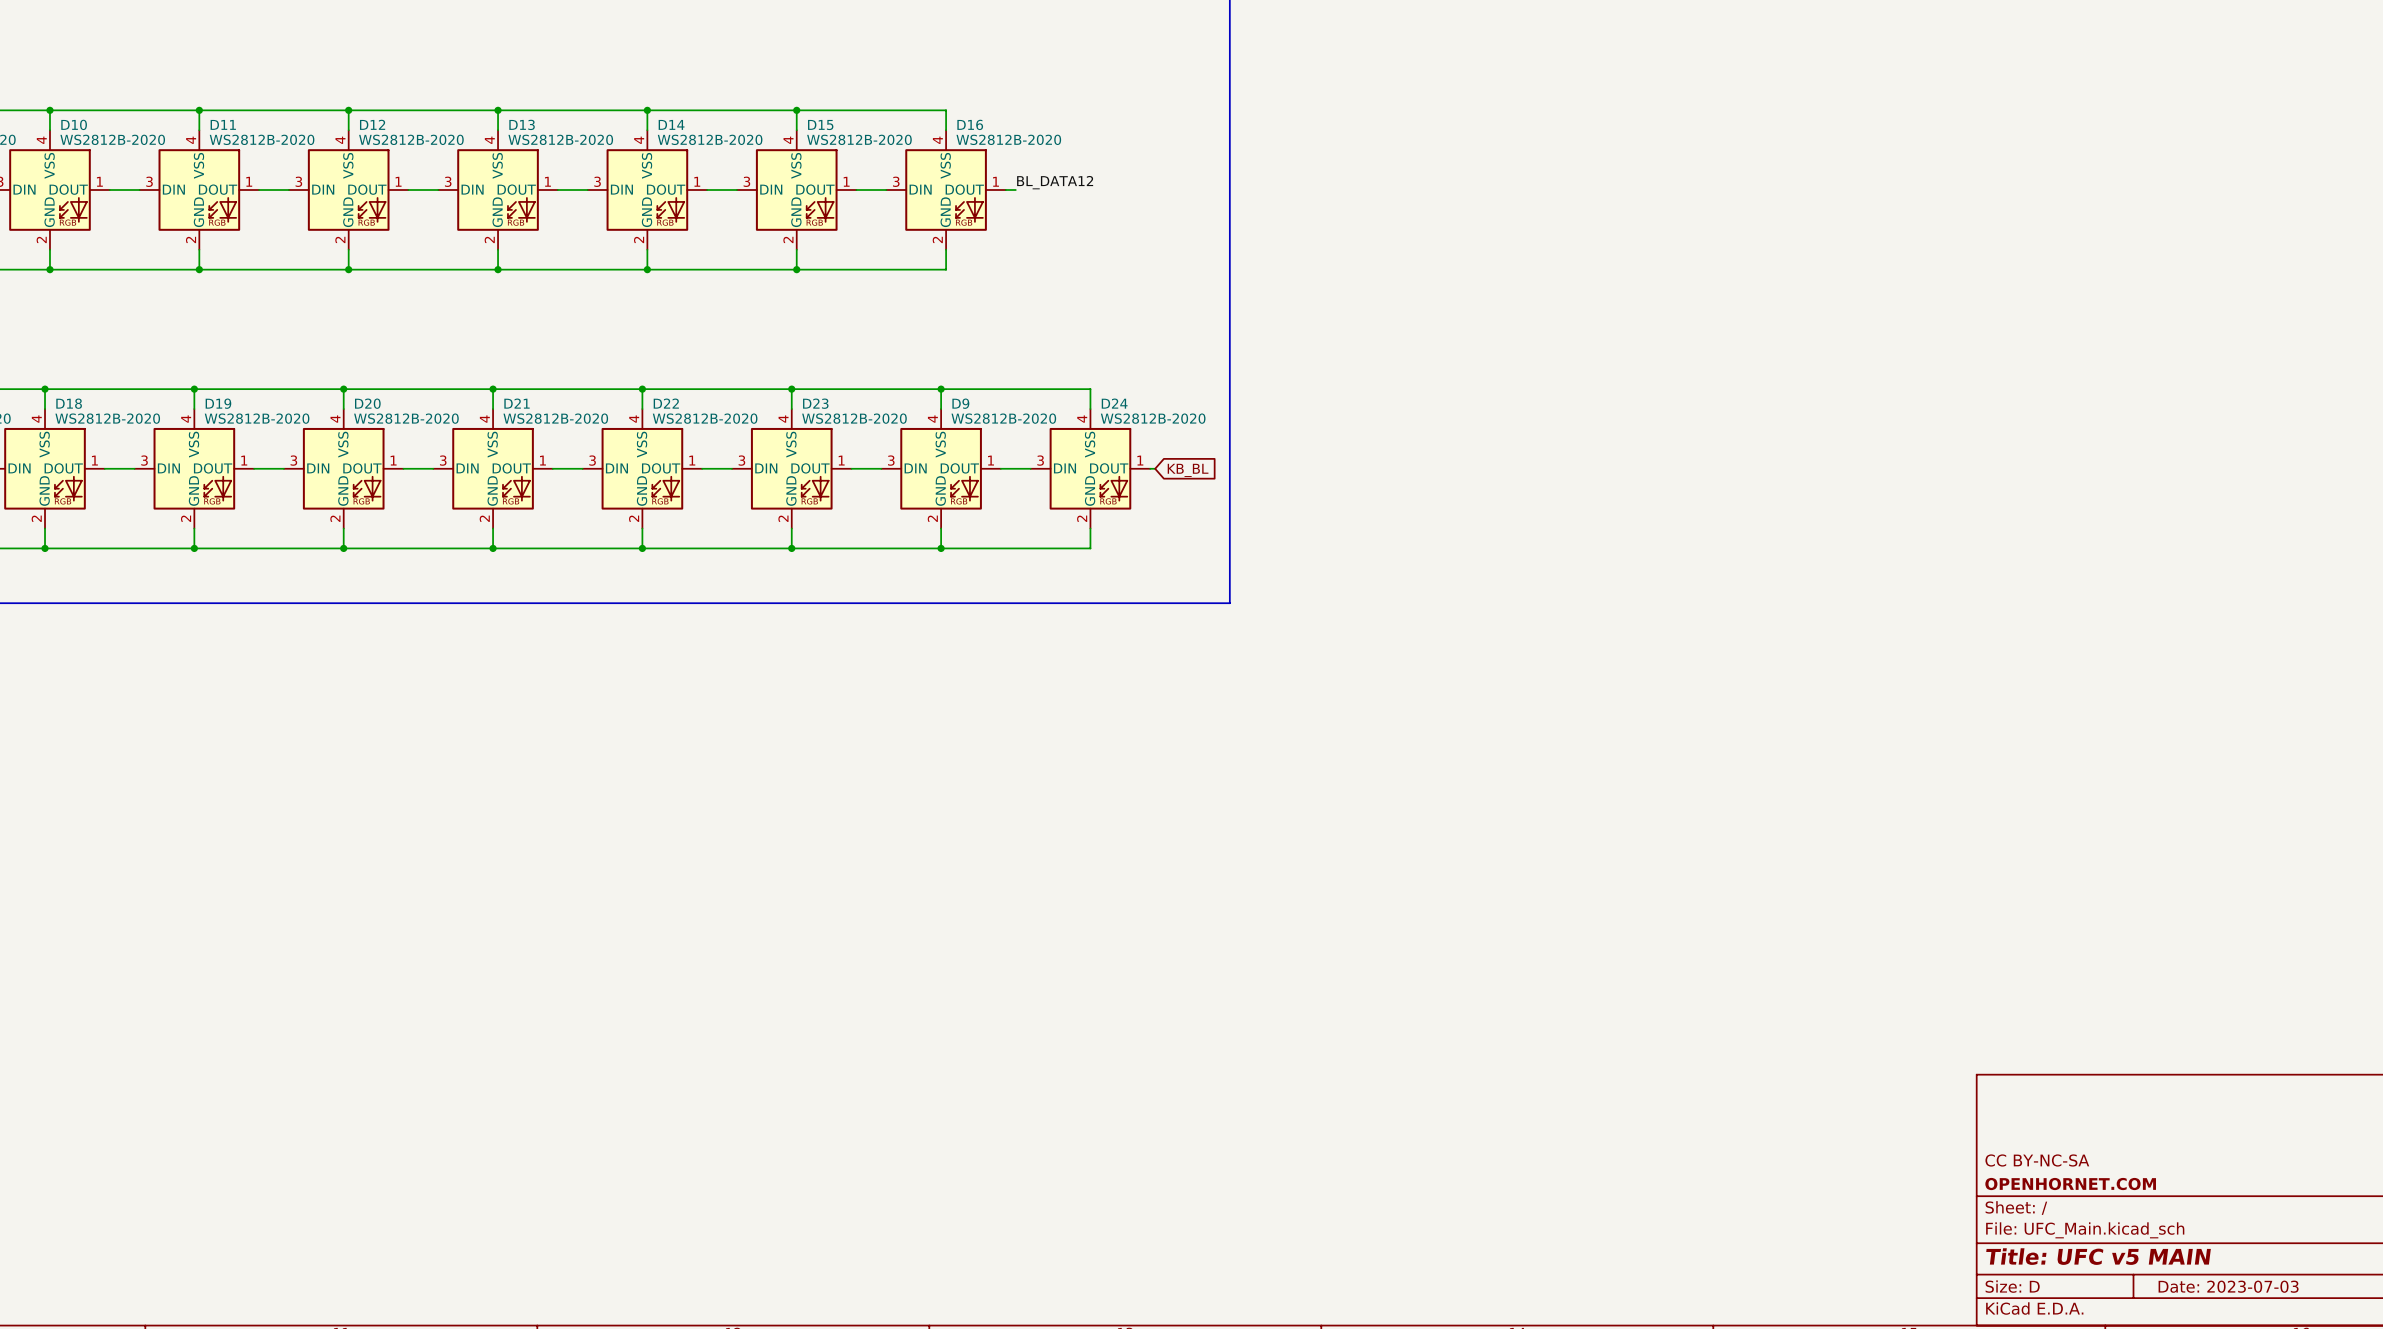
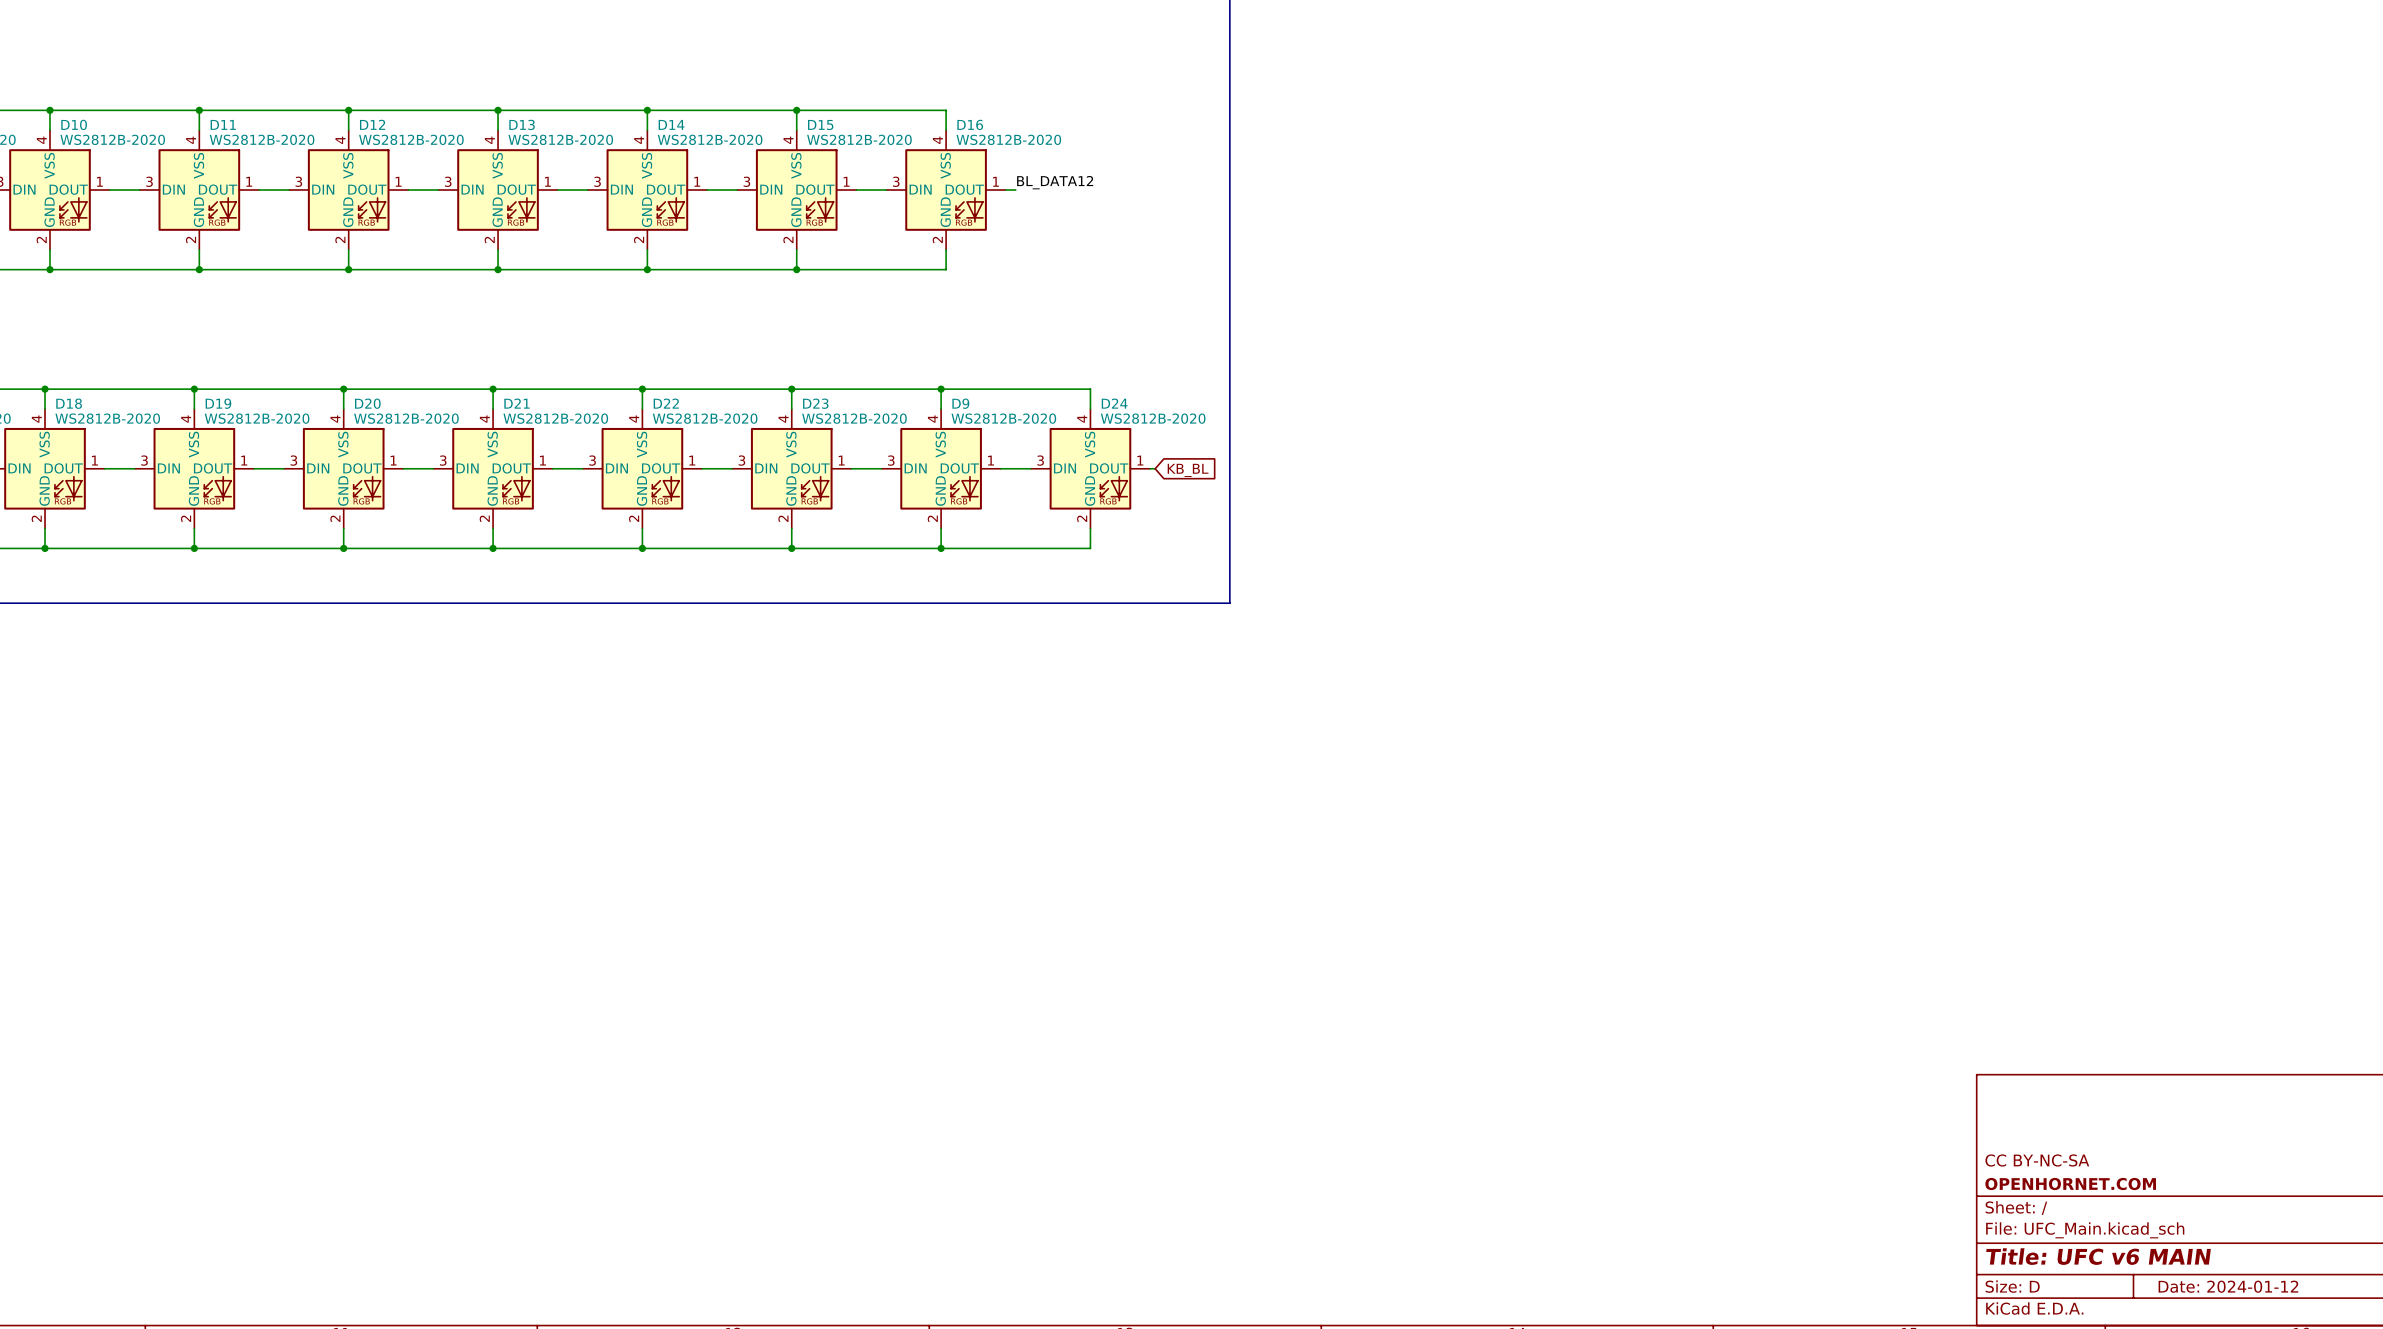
title block: Title: UFC v5 MAIN (2098, 1256) -> Title: UFC v6 MAIN (2098, 1256)
title block: Date: 2023-07-03 (2228, 1286) -> Date: 2024-01-12 (2228, 1286)

